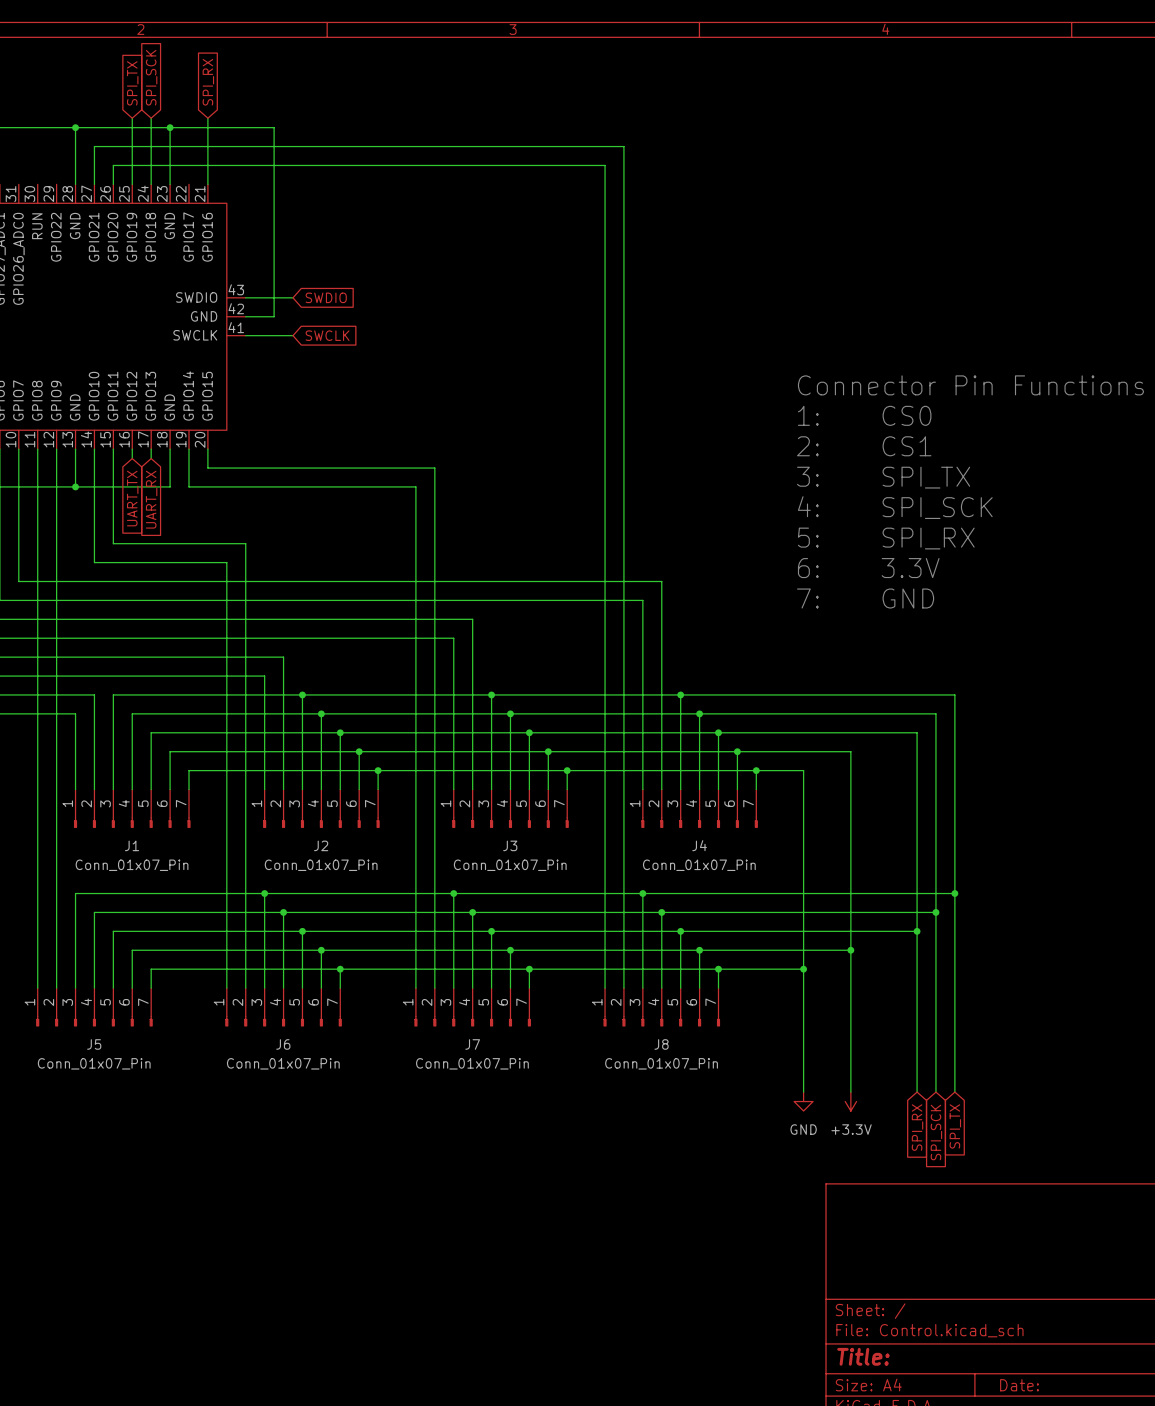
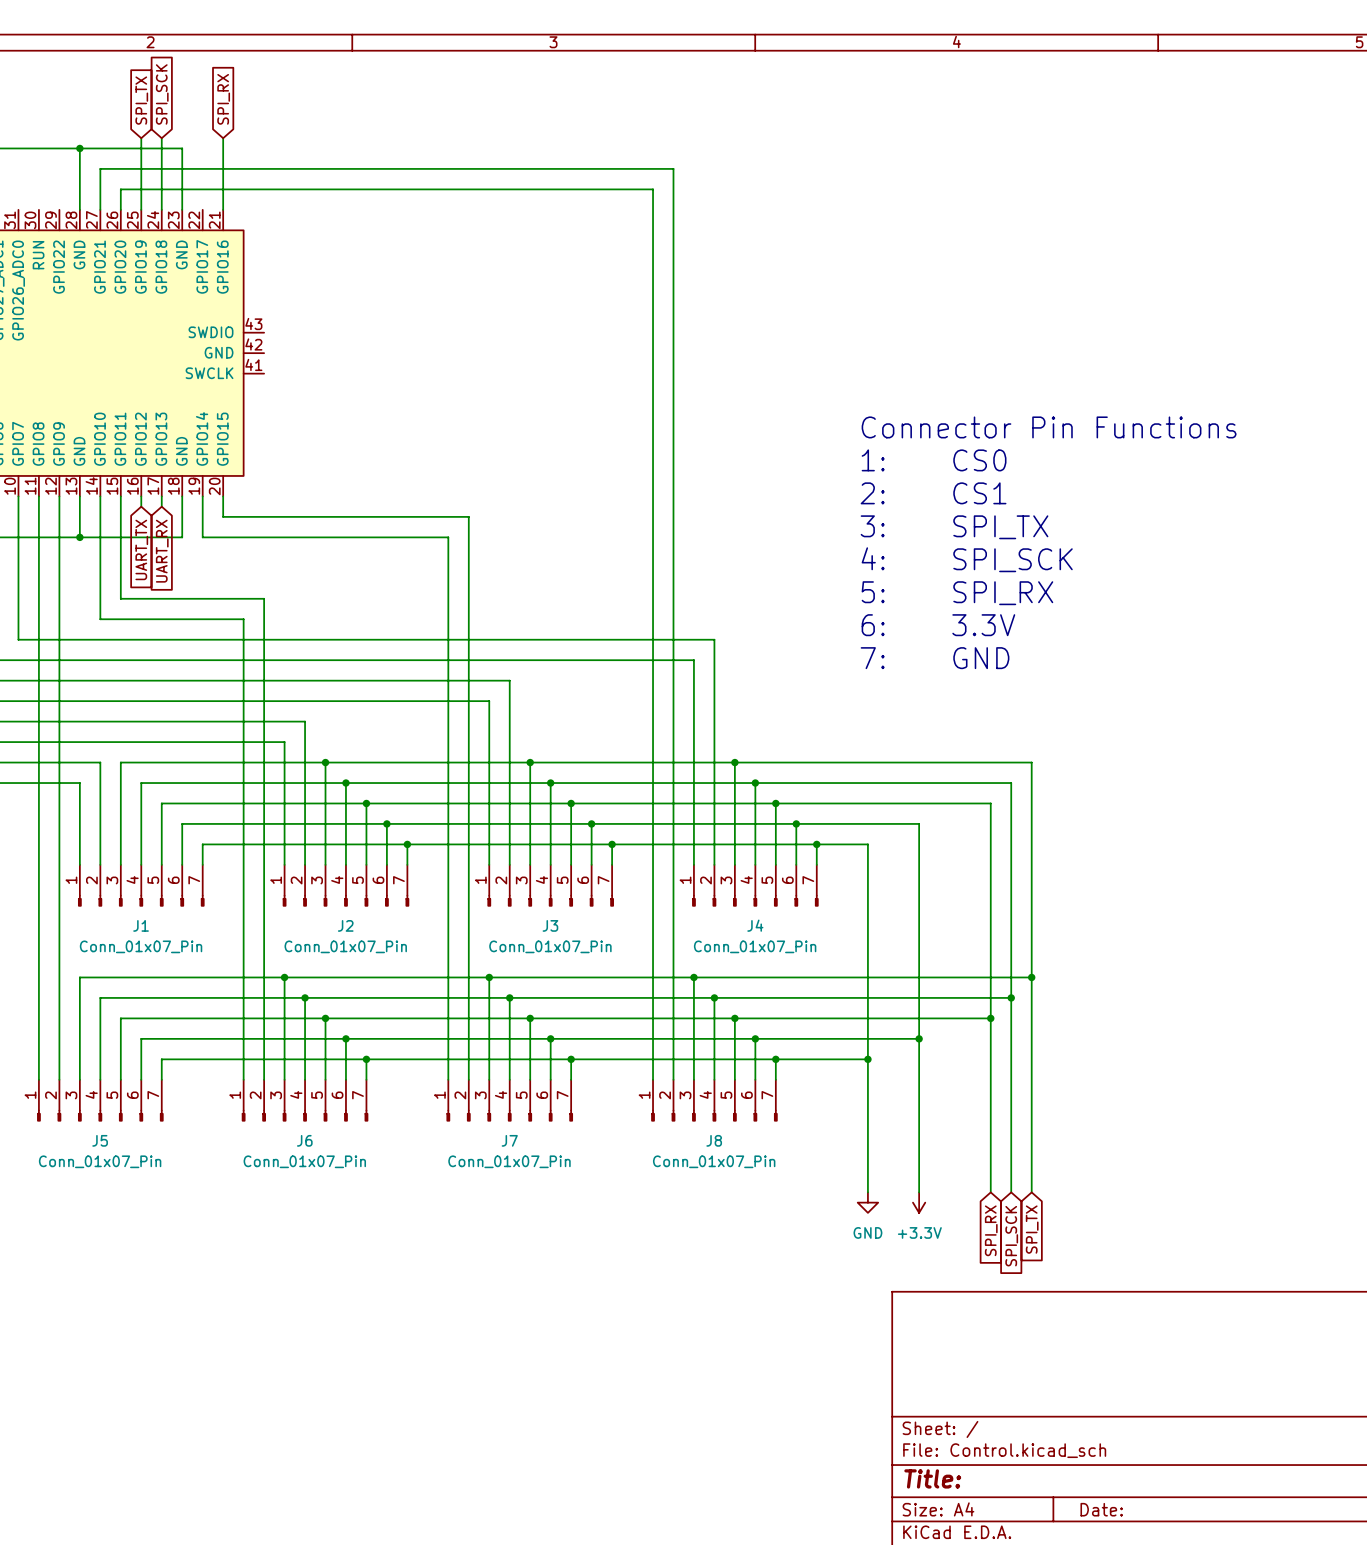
wire: (170, 127) (274, 127) (274, 316) (245, 316) -> none
junction: (170, 127) -> none
wire: (245, 297) (293, 297) -> none
global label: SWDIO (326, 297) -> none
wire: (245, 335) (293, 335) -> none
global label: SWCLK (327, 335) -> none

